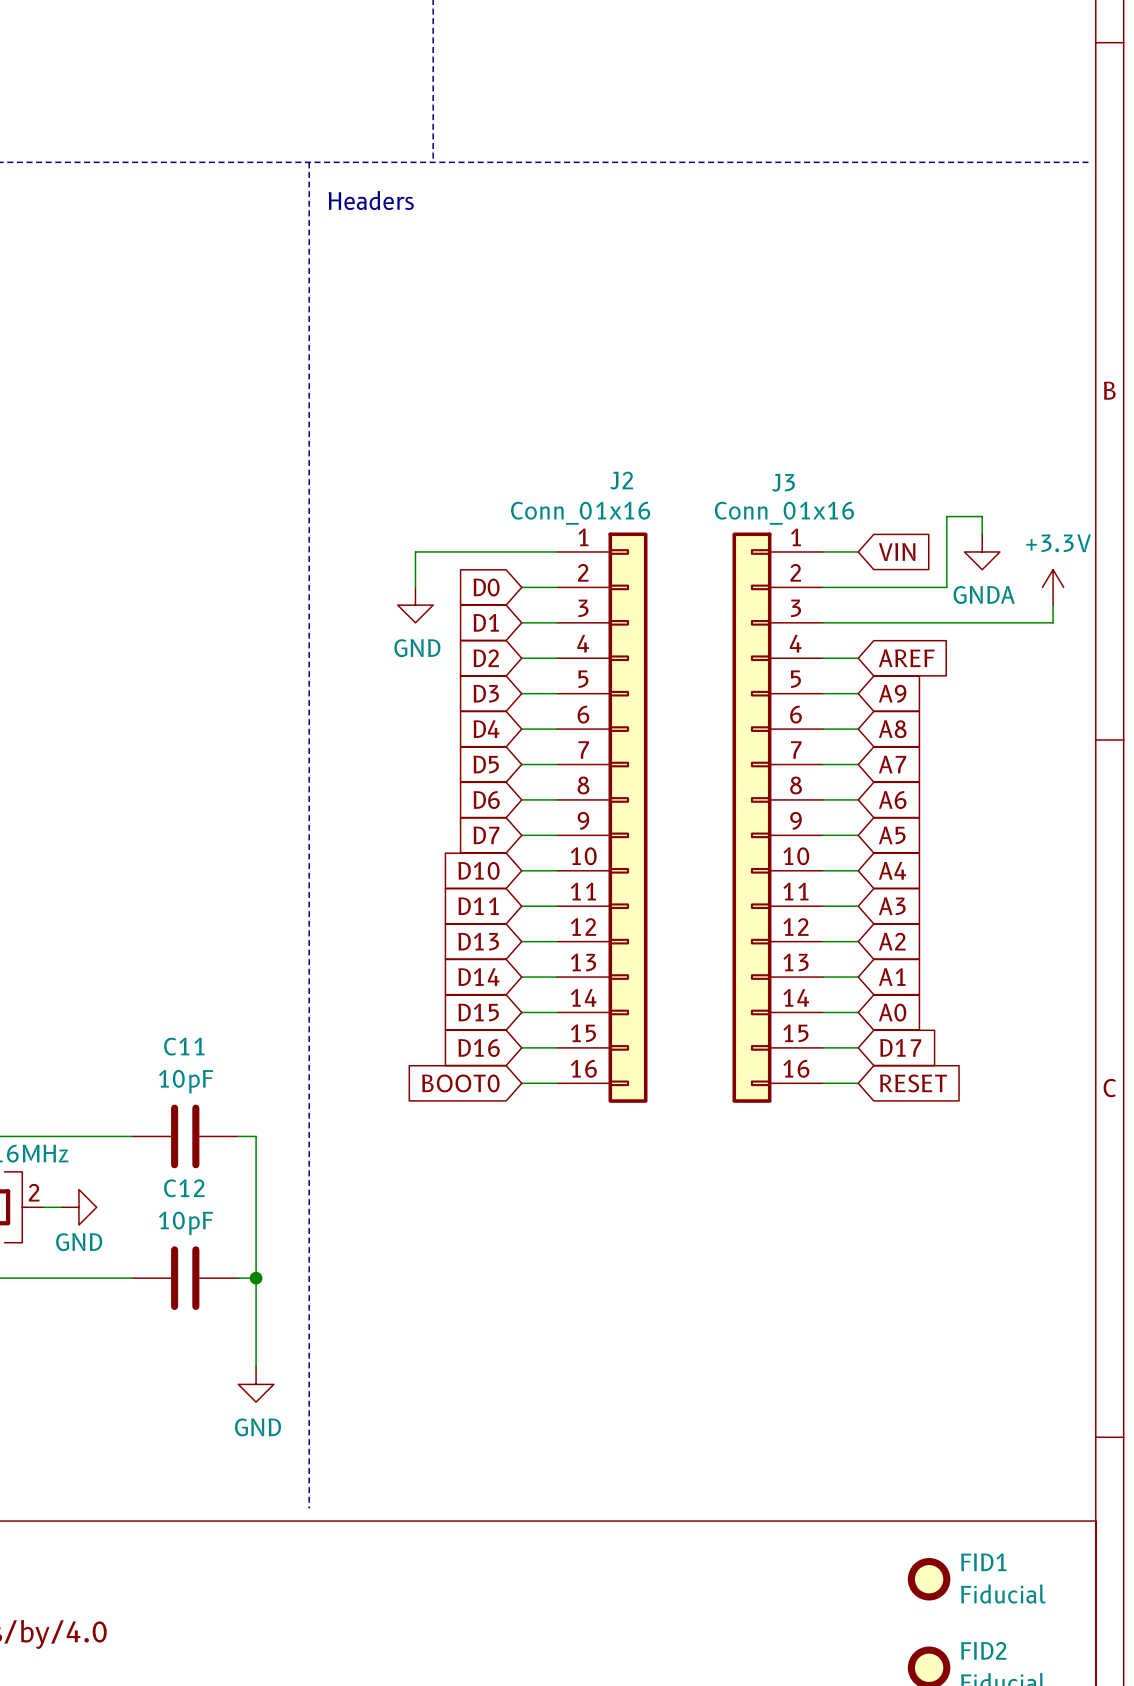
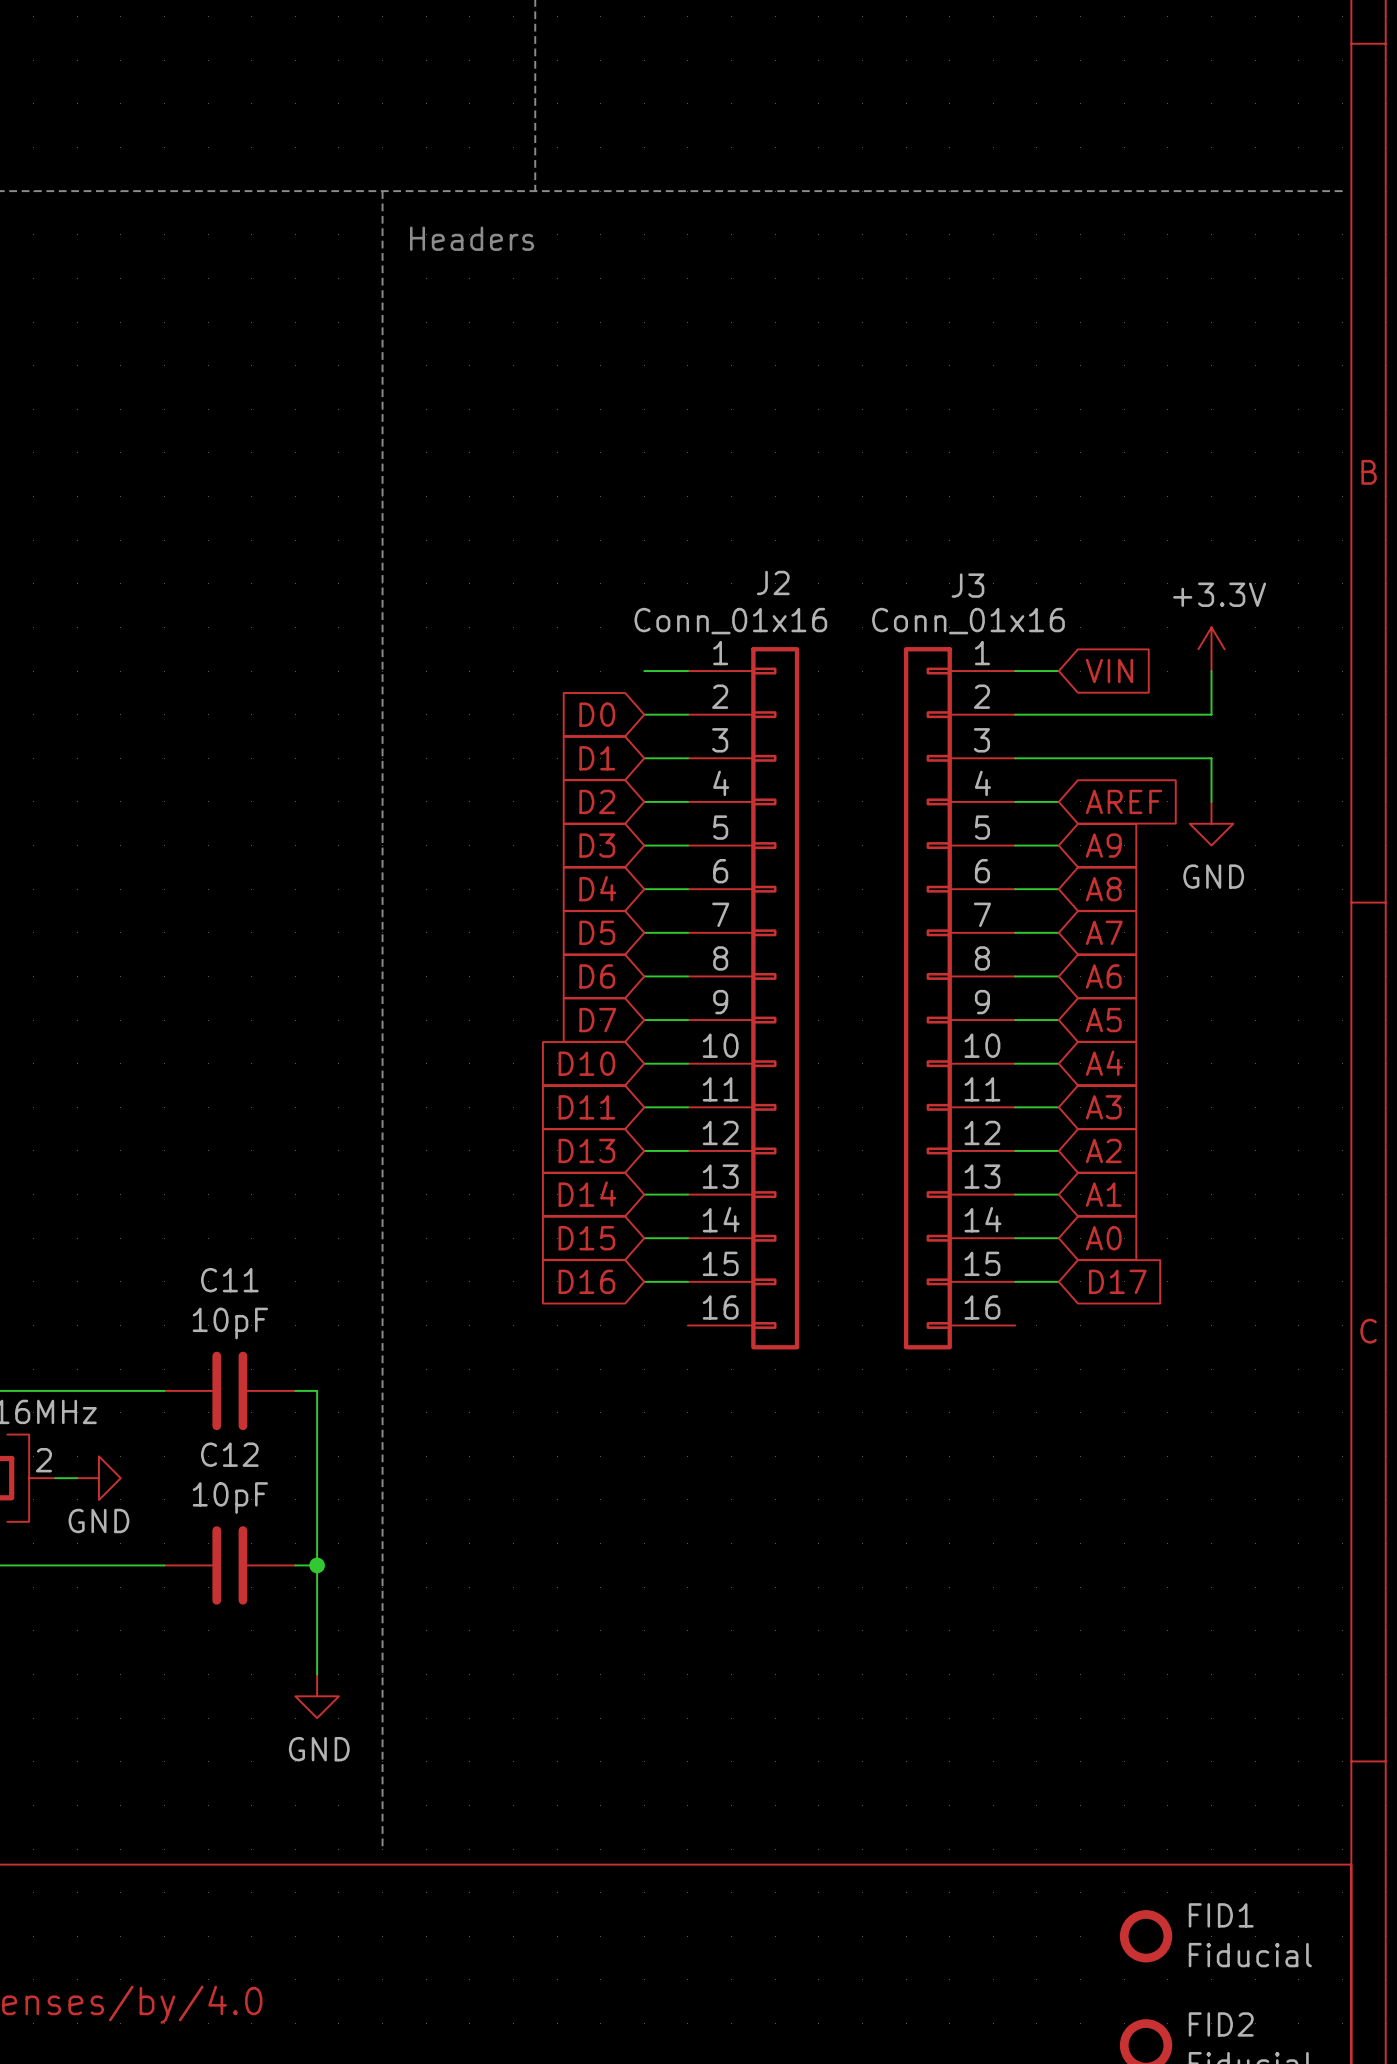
wire: (982, 534) (982, 516) (946, 516) (946, 587) -> (1211, 671) (1211, 714) (1167, 714)
wire: (521, 551) (415, 551) (415, 587) -> none
power symbol: GNDA (982, 551) -> none
power symbol position: +3.3V (1053, 587) -> +3.3V (1211, 649)
power symbol: GND (415, 605) -> none
wire: (1053, 605) (1053, 622) (982, 622) -> (1211, 801) (1211, 758)
power symbol: none -> GND (1211, 823)
global label: BOOT0 (460, 1083) -> none
wire: (521, 1083) (557, 1083) -> none
wire: (822, 1083) (858, 1083) -> none
global label: RESET (913, 1083) -> none

